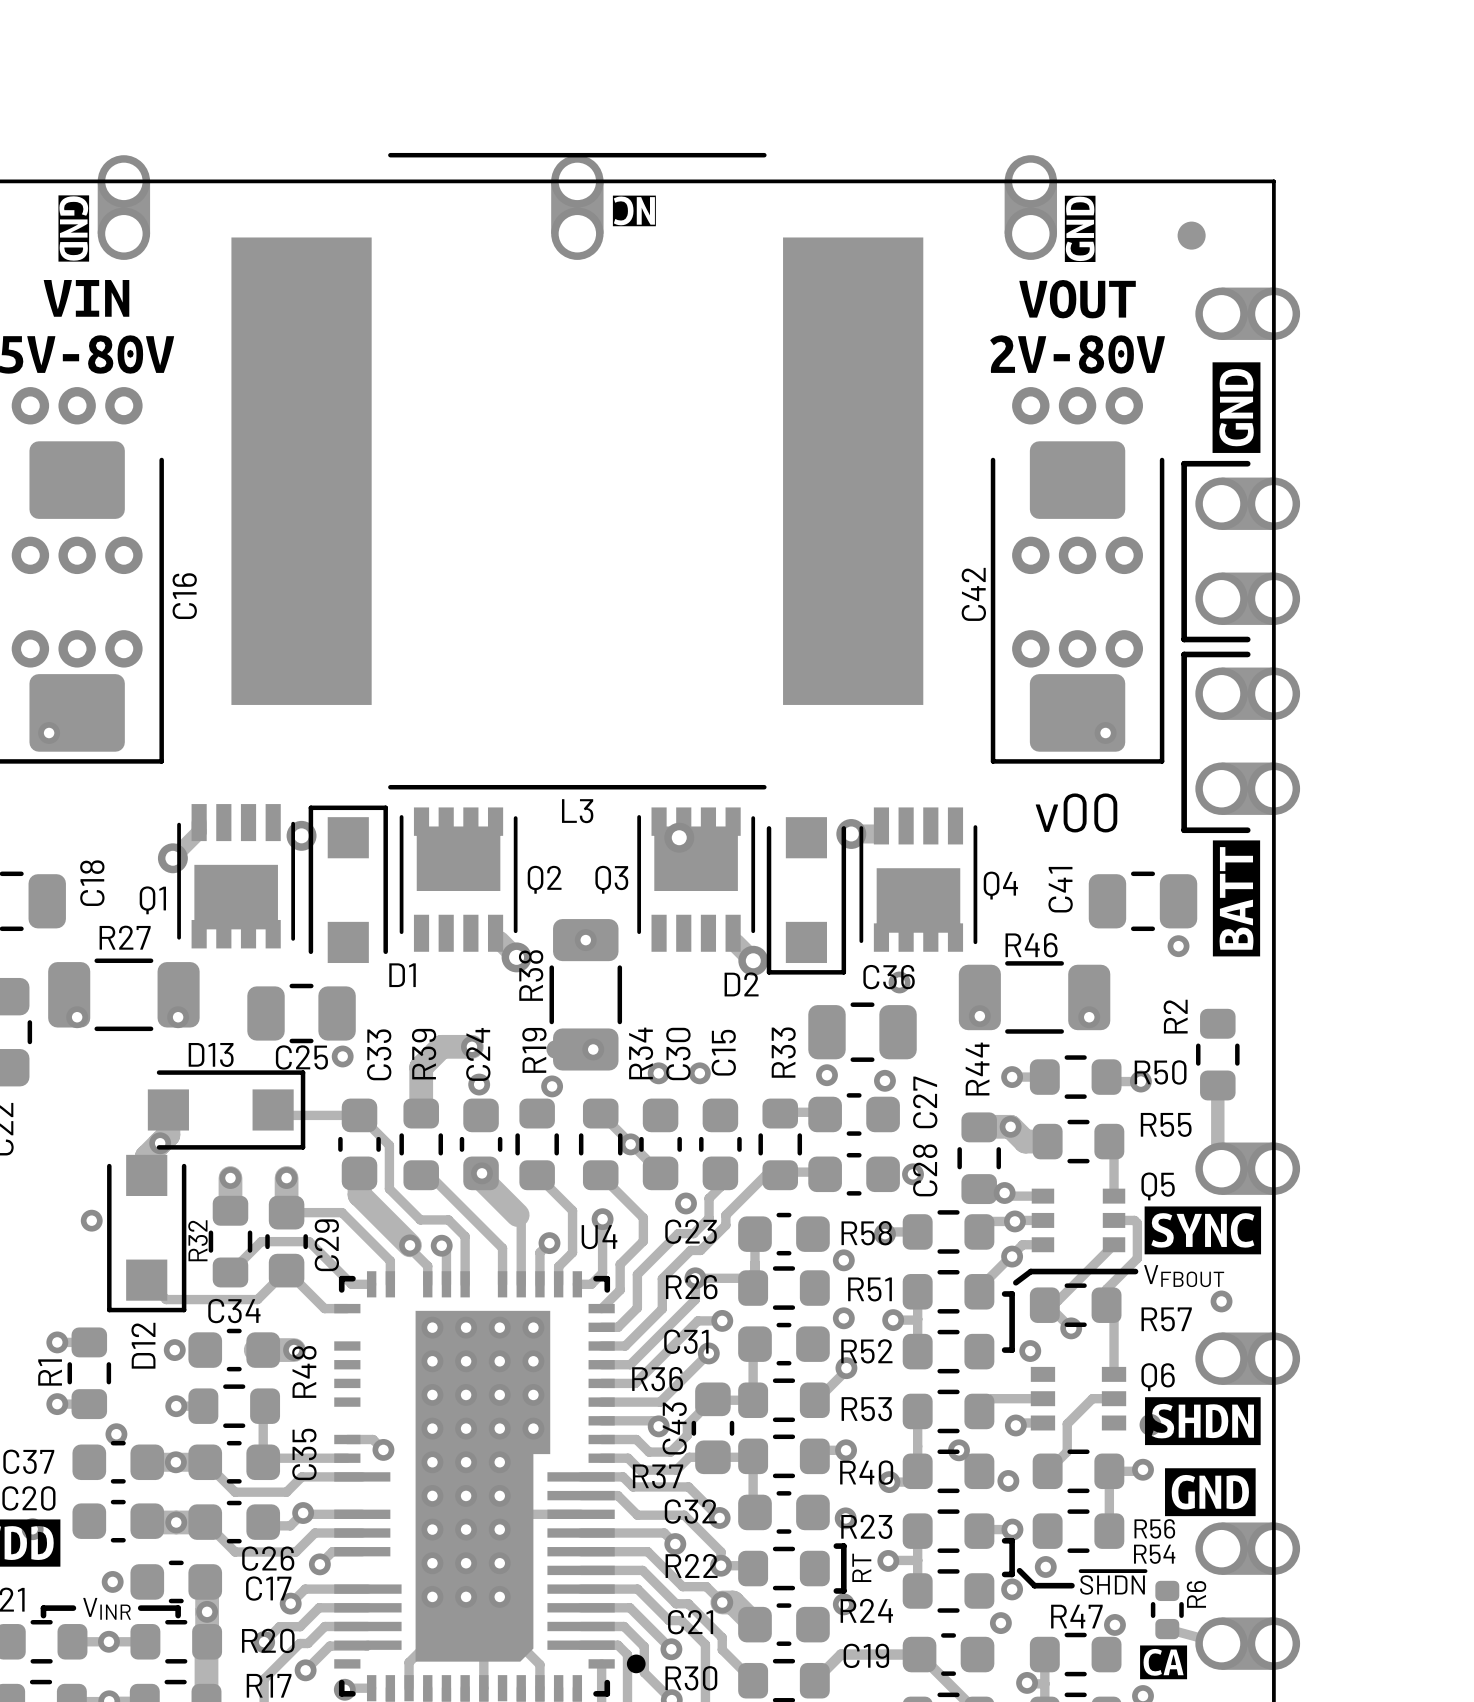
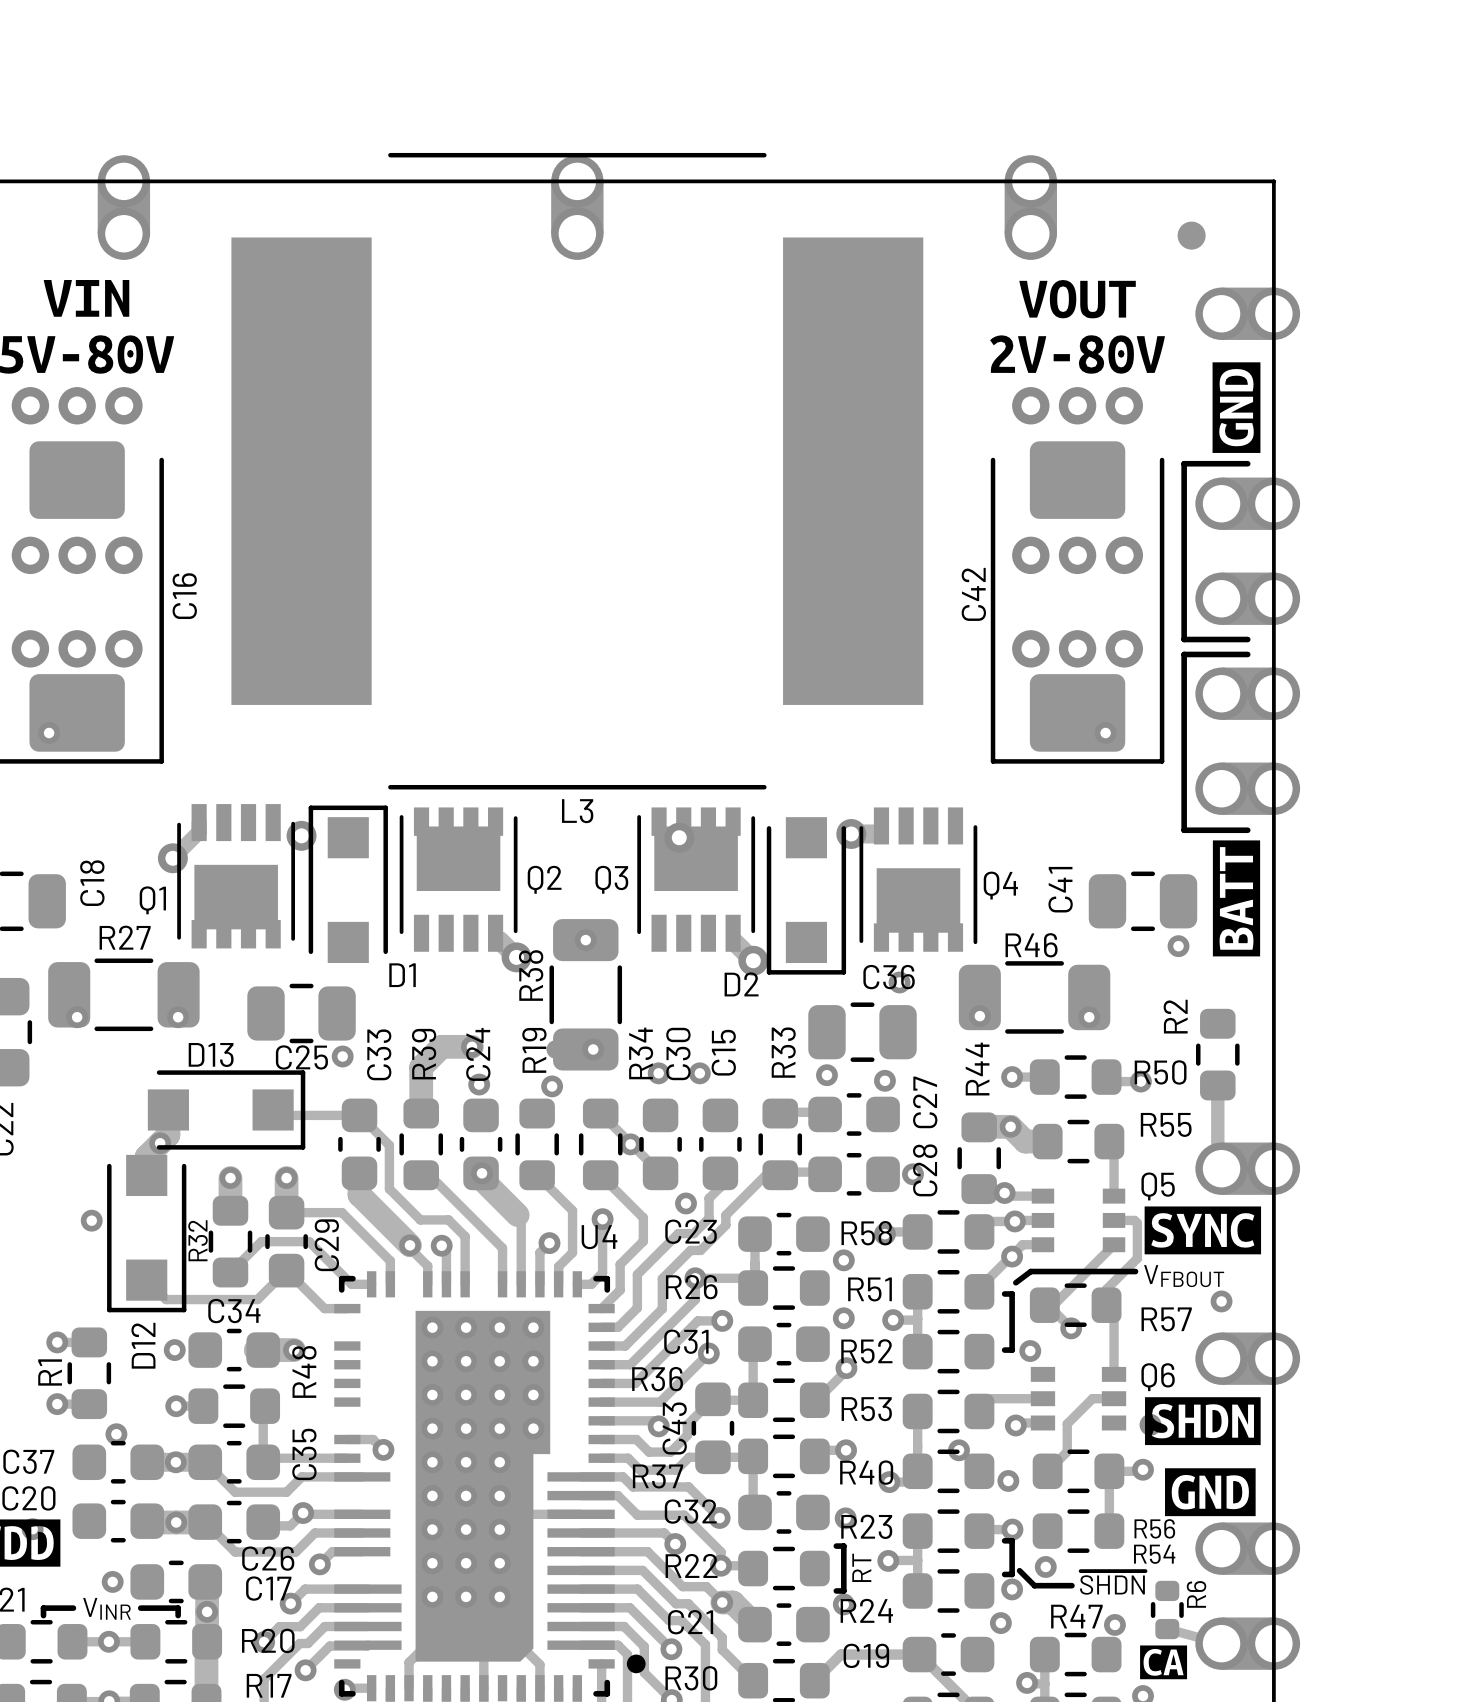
drawing: [58, 195, 90, 262] -> none
drawing: [612, 195, 656, 227] -> none
drawing: [1064, 195, 1096, 262] -> none
text: v00 (1076, 812) -> none

